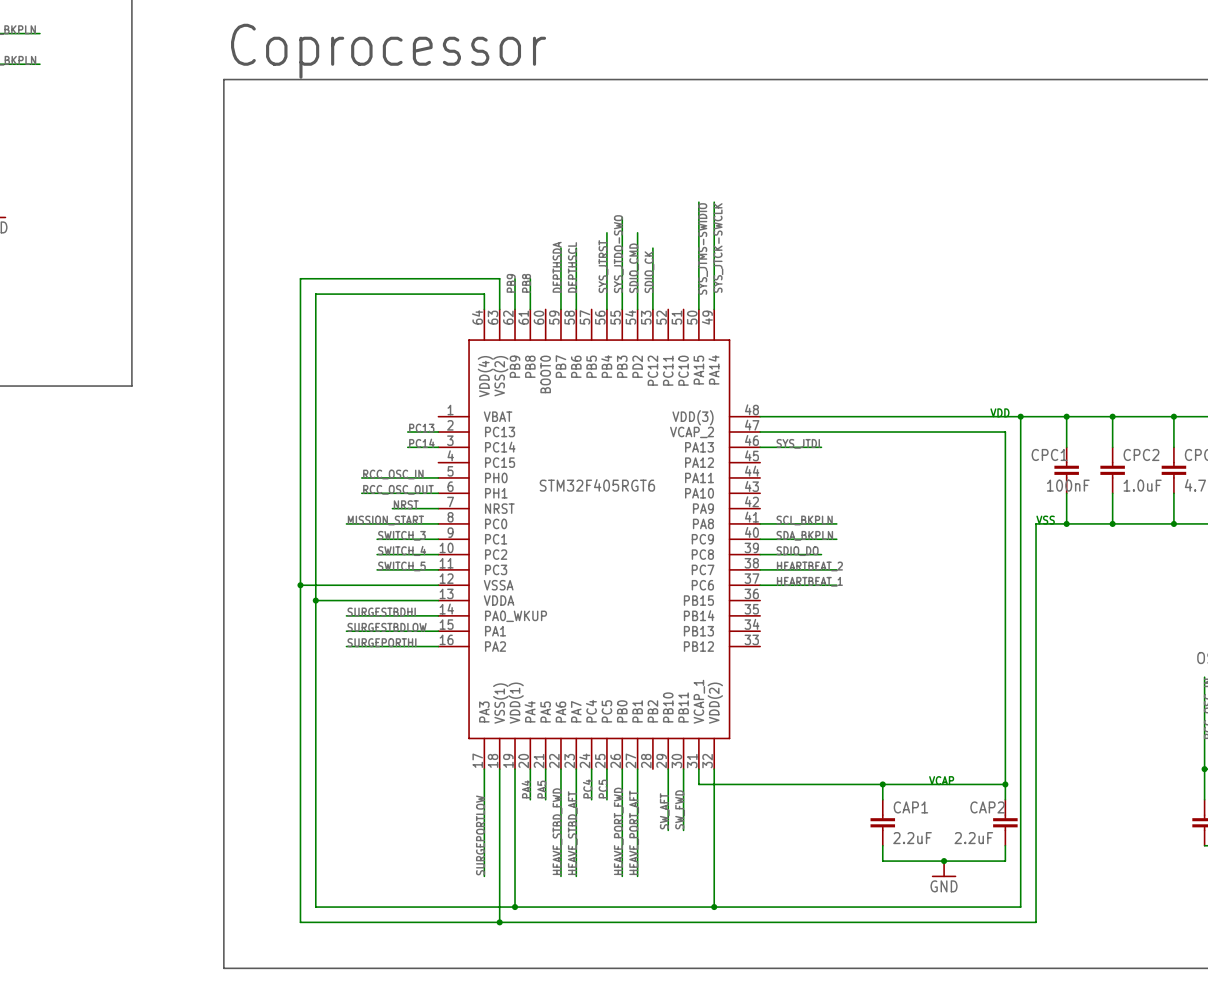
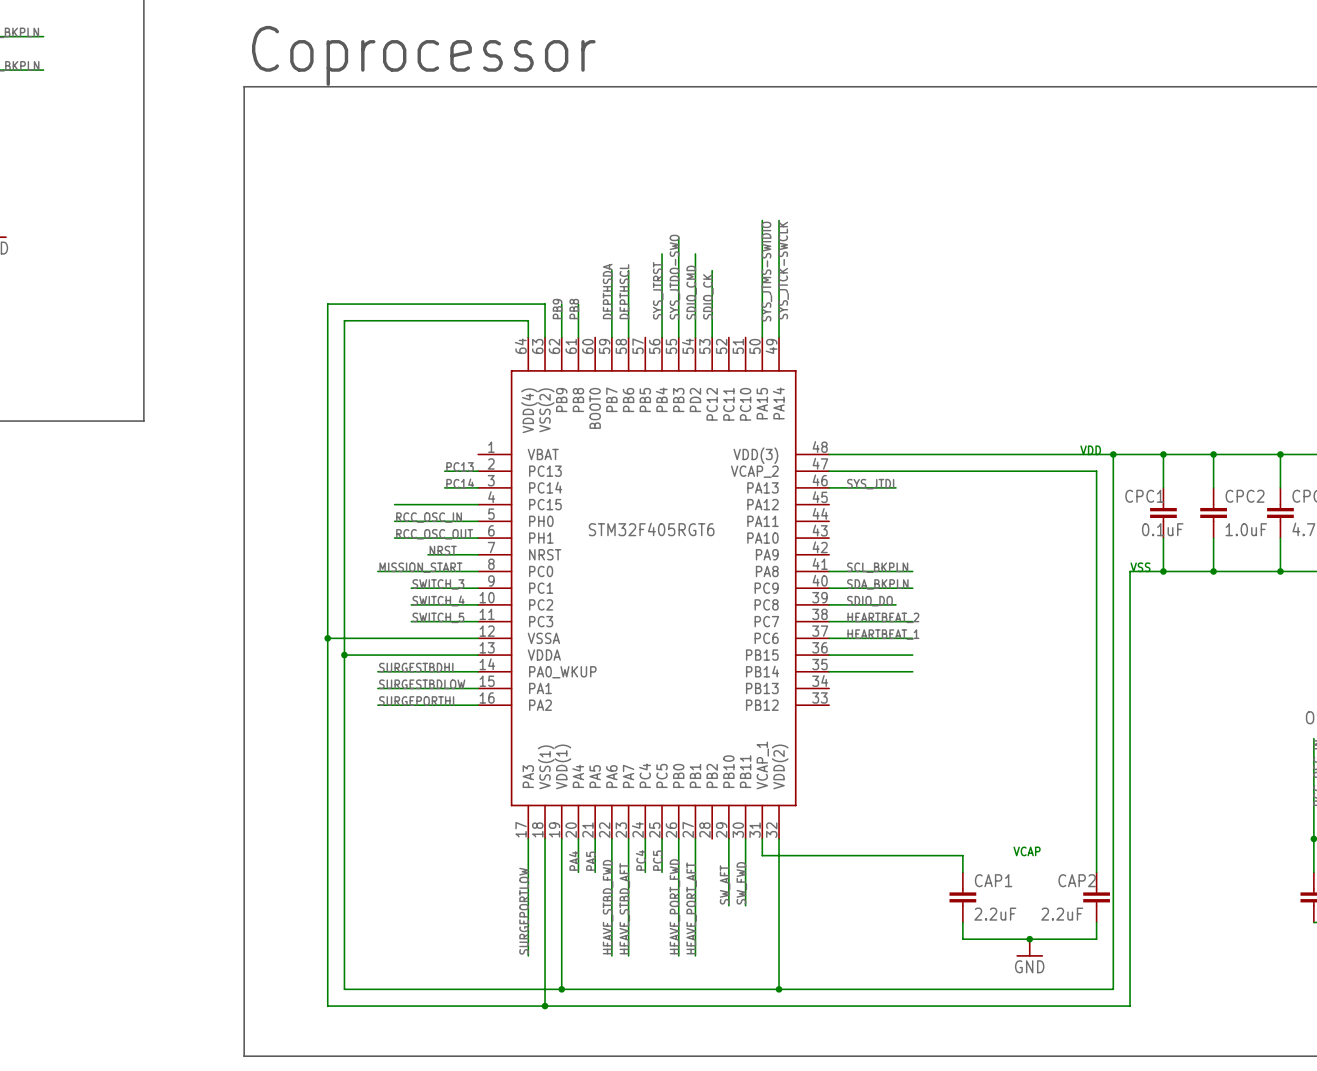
wire: none -> (394, 504) (478, 504)
CPC1 value: 100nF (1068, 485) -> 0.1uF (1162, 529)
wire: none -> (829, 655) (912, 655)
wire: none -> (829, 671) (912, 671)
wire: (882, 784) (1005, 784) -> none
junction: (882, 784) -> none
junction: (1005, 784) -> none

